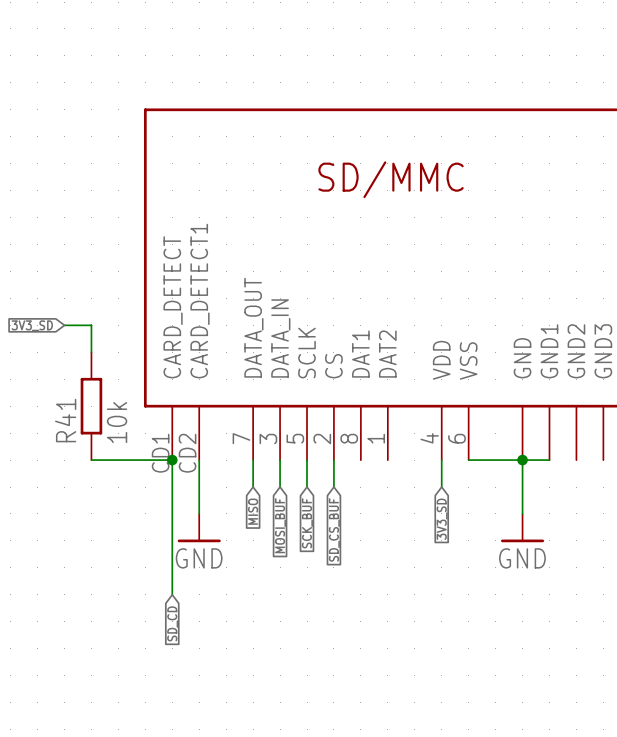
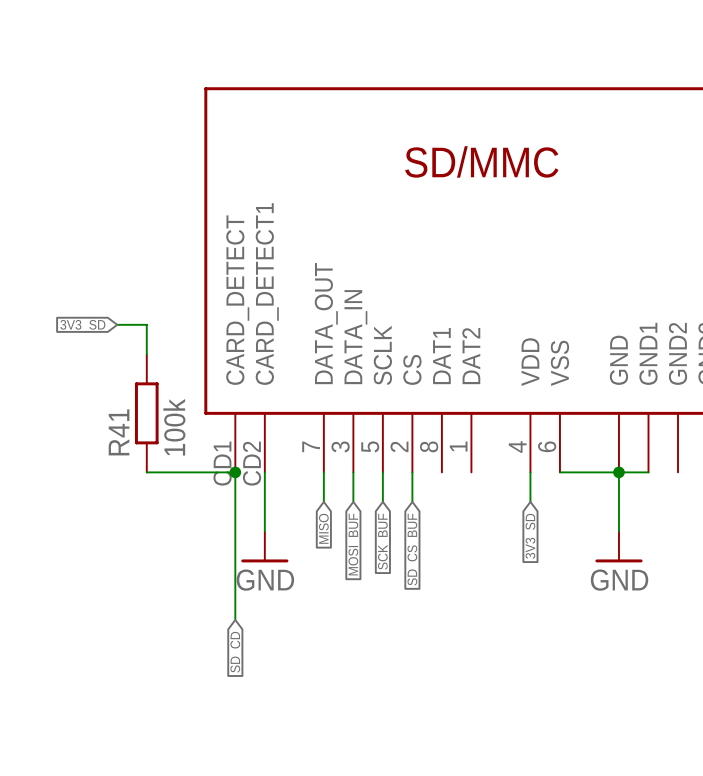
R41 value: 10k (117, 422) -> 100k (174, 427)

